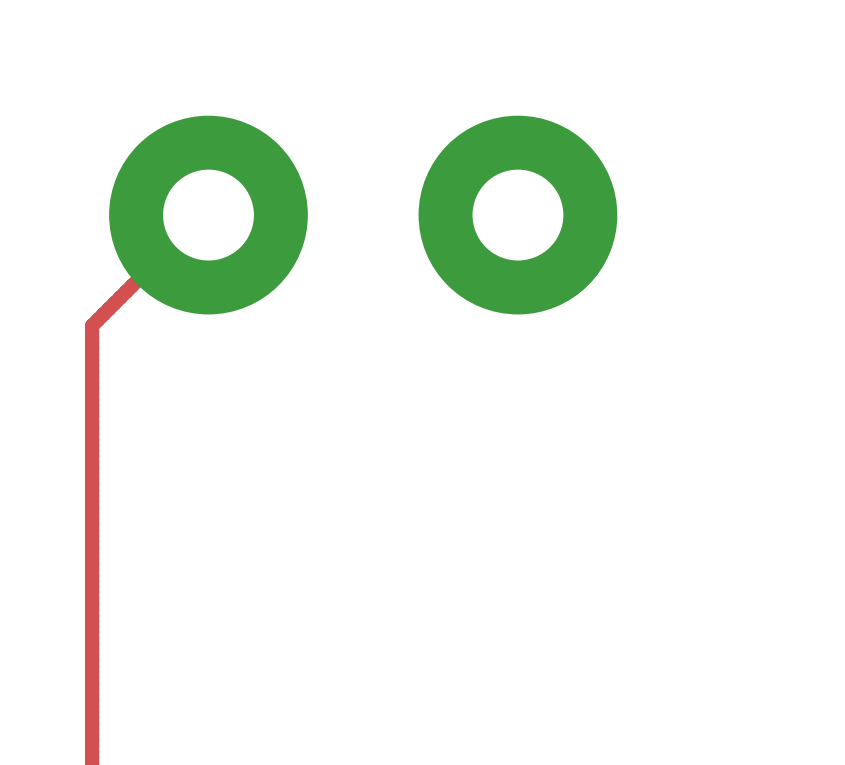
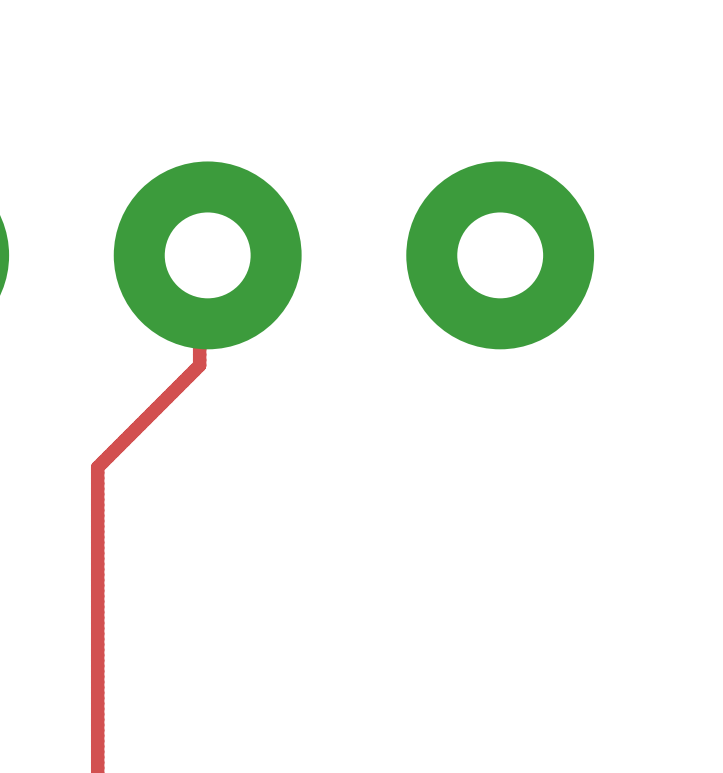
track: (199, 217) (92, 325) (92, 439) -> (199, 258) (199, 365) (97, 467)

